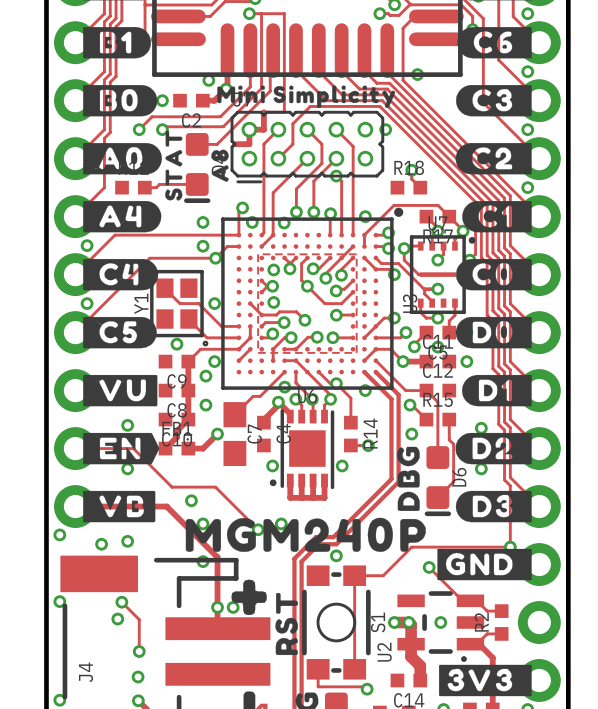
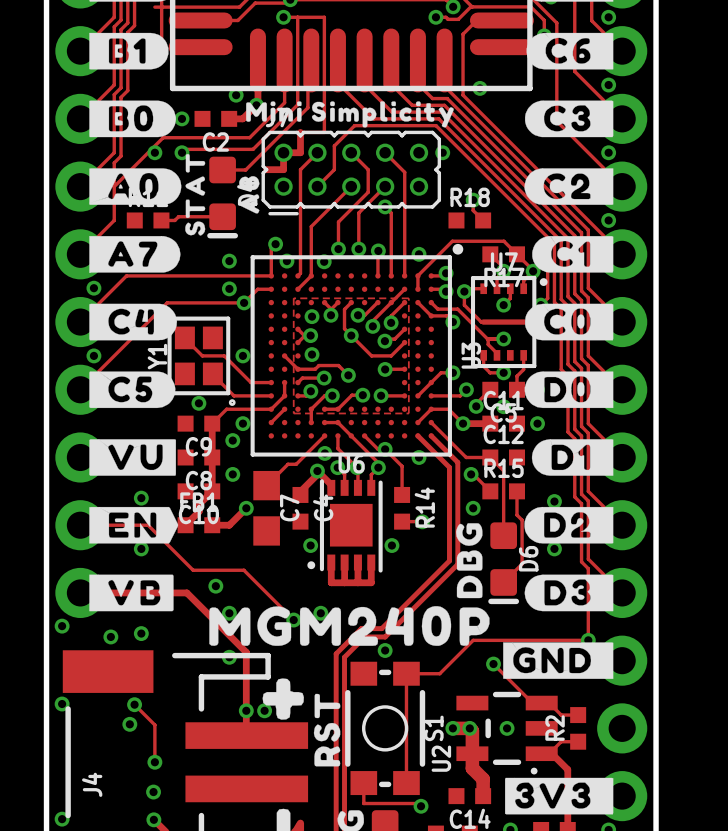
track: none -> (154, 7) (161, 7)
track: (152, 116) (139, 129) -> (169, 137) (163, 137) (114, 186)
drawing shape: [83, 200, 162, 233] -> [89, 236, 181, 273]

